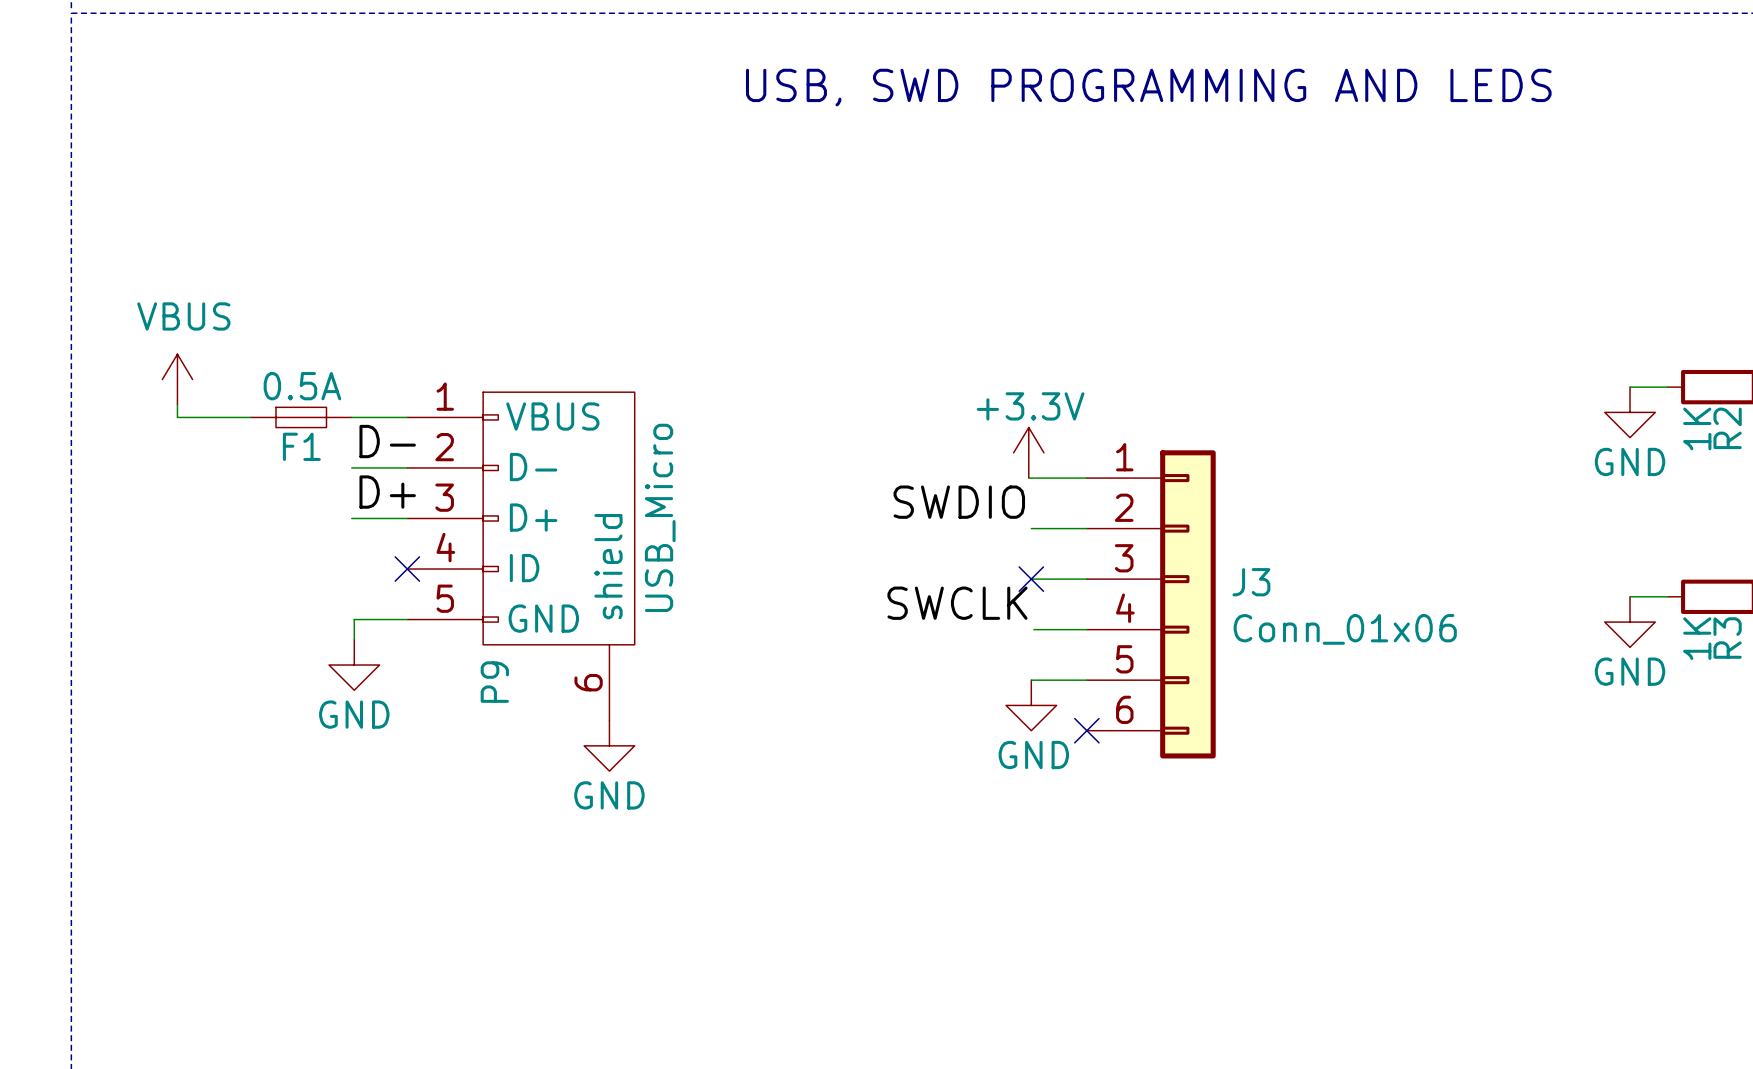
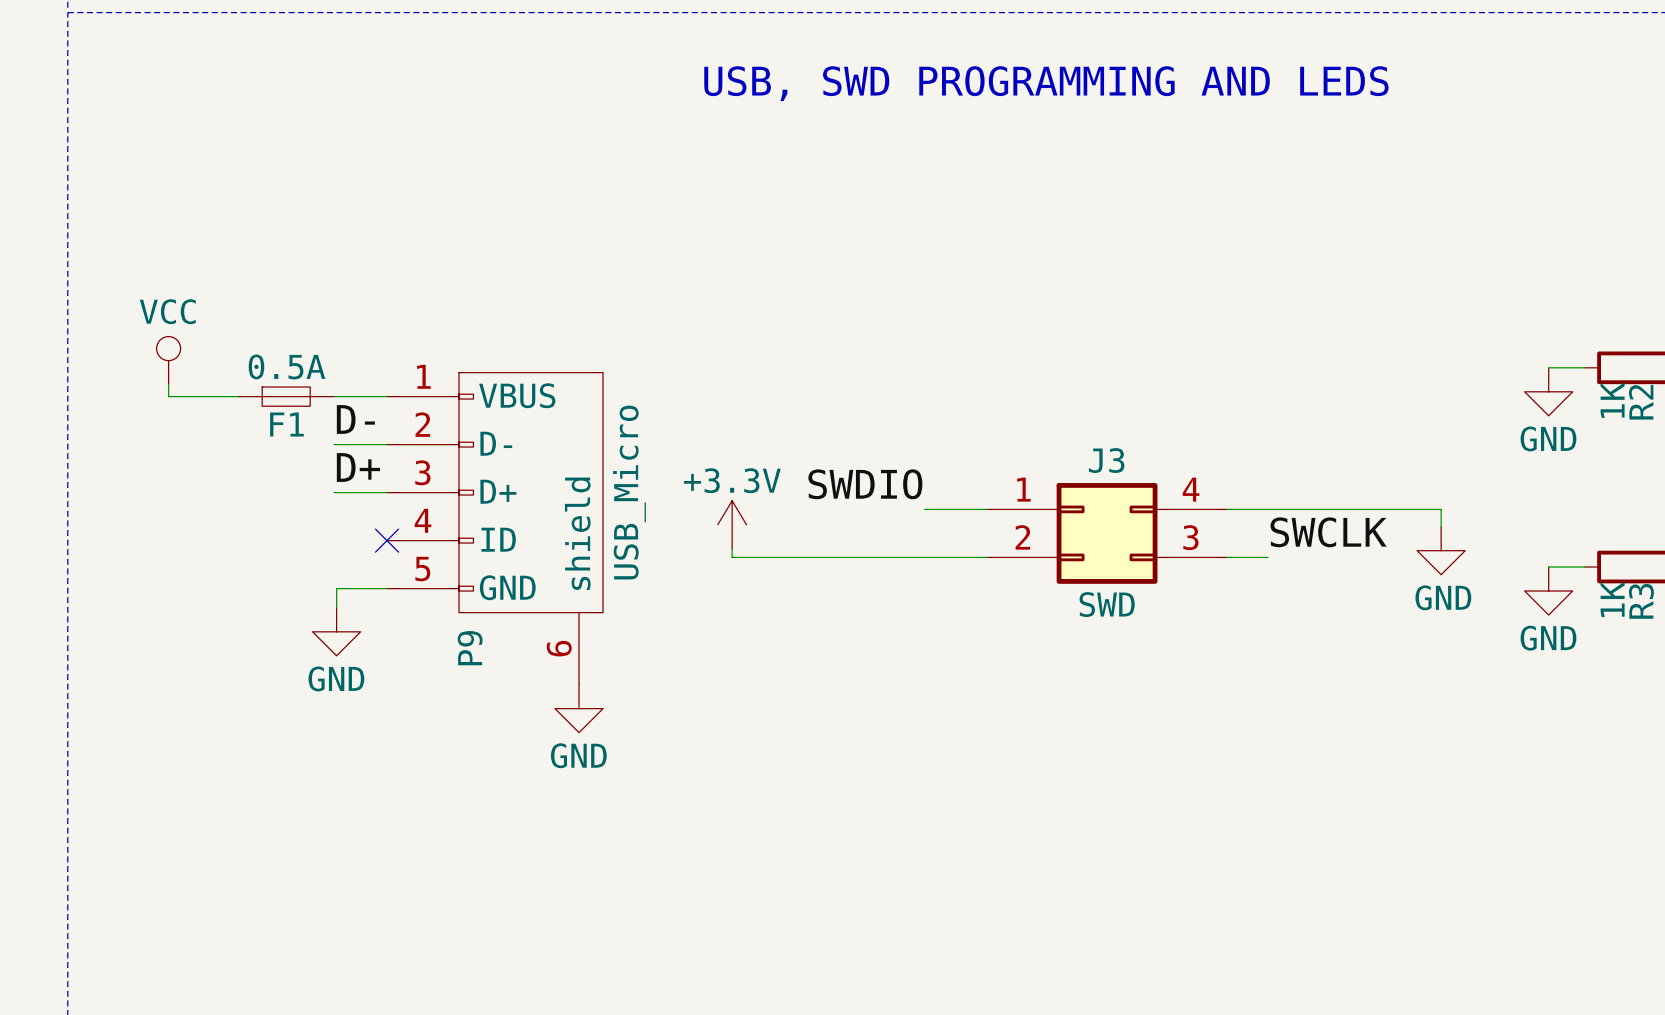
power symbol: VBUS (177, 379) -> VCC (168, 360)
J3 symbol: [1086, 450, 1216, 759] -> [987, 483, 1228, 584]
power symbol position: +3.3V (1028, 452) -> +3.3V (732, 524)
wire: (1028, 478) (1086, 478) -> none
label position: SWDIO (959, 502) -> SWDIO (865, 484)
wire: (1031, 528) (1086, 528) -> none
wire: none -> (924, 509) (987, 509)
wire: none -> (1227, 509) (1441, 509) (1441, 526)
wire: none -> (732, 548) (732, 557) (987, 557)
wire: (1031, 579) (1086, 579) -> none
no-connect mark: (1031, 579) -> none
power symbol: none -> GND (1441, 550)
J3 name position: J3 (1251, 582) -> J3 (1106, 460)
wire: none -> (1227, 557) (1267, 557)
label position: SWCLK (957, 603) -> SWCLK (1328, 532)
wire: (1033, 629) (1086, 629) -> none
J3 value: Conn_01x06 (1345, 629) -> SWD (1107, 604)
wire: (1031, 680) (1086, 680) -> none
power symbol: GND (1031, 705) -> none
no-connect mark: (1086, 730) -> none

